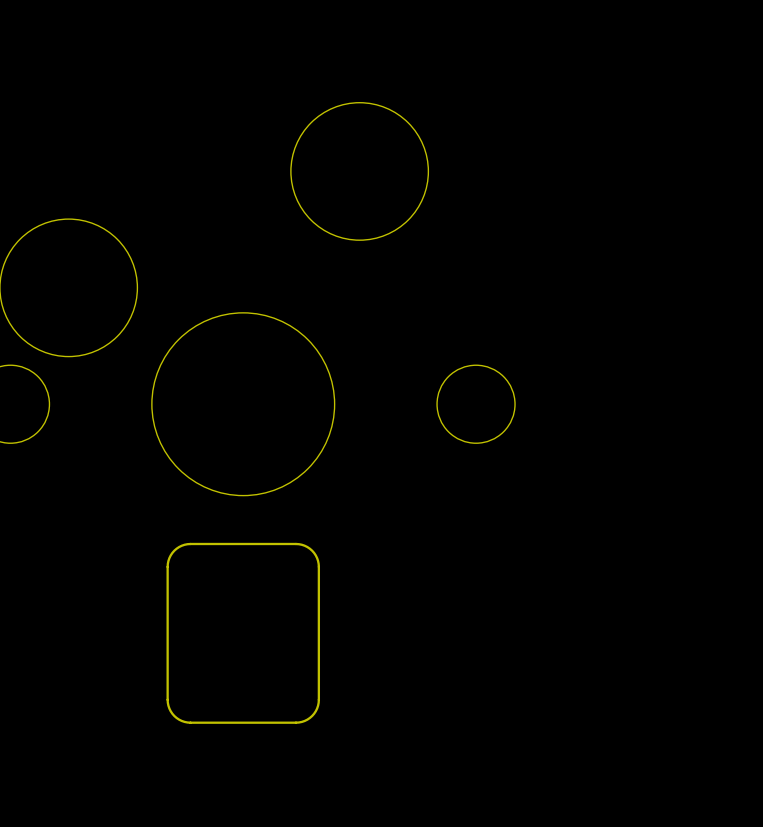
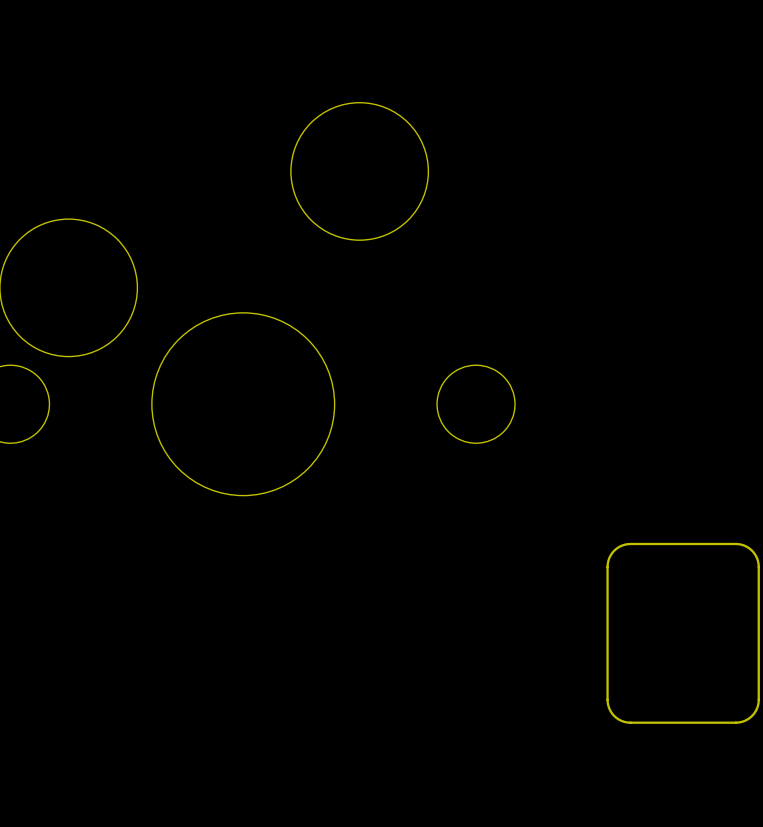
part: (243, 633) -> none
part: none -> (683, 633)

